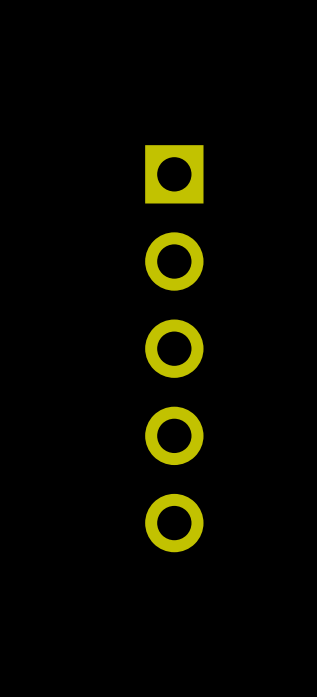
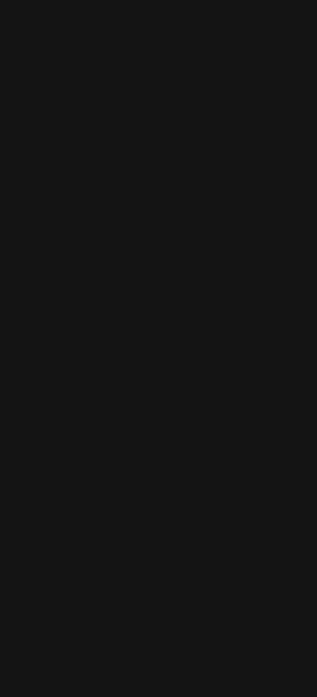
part: (174, 348) -> none

